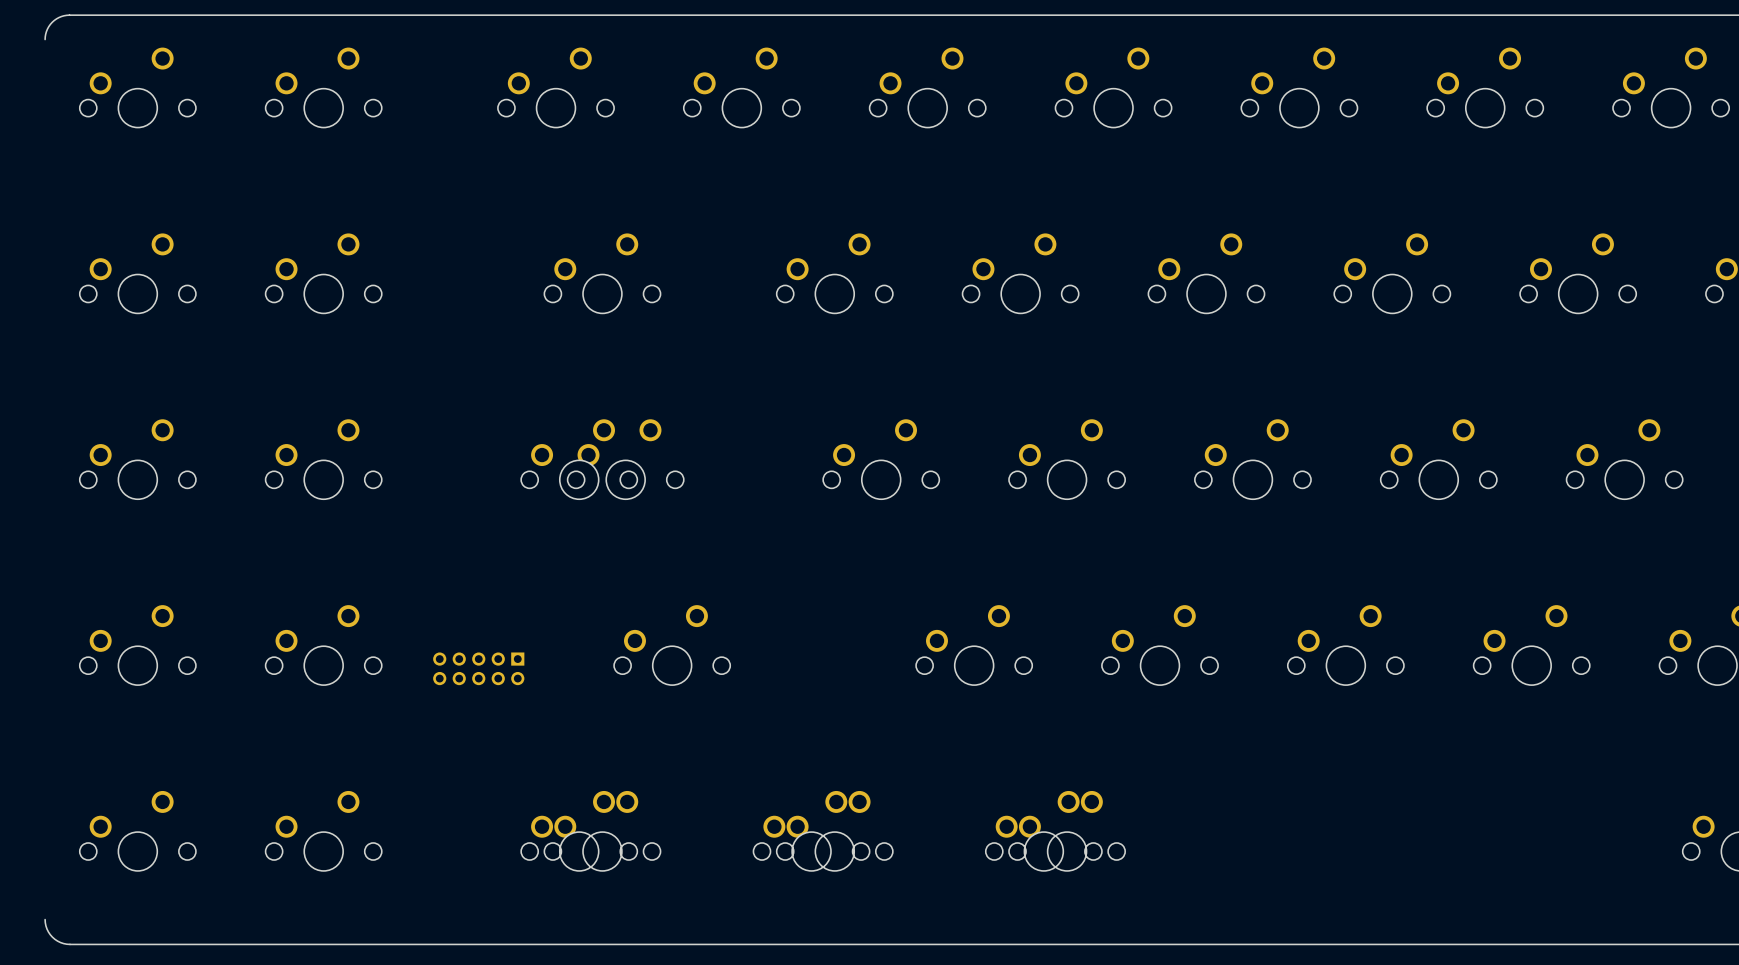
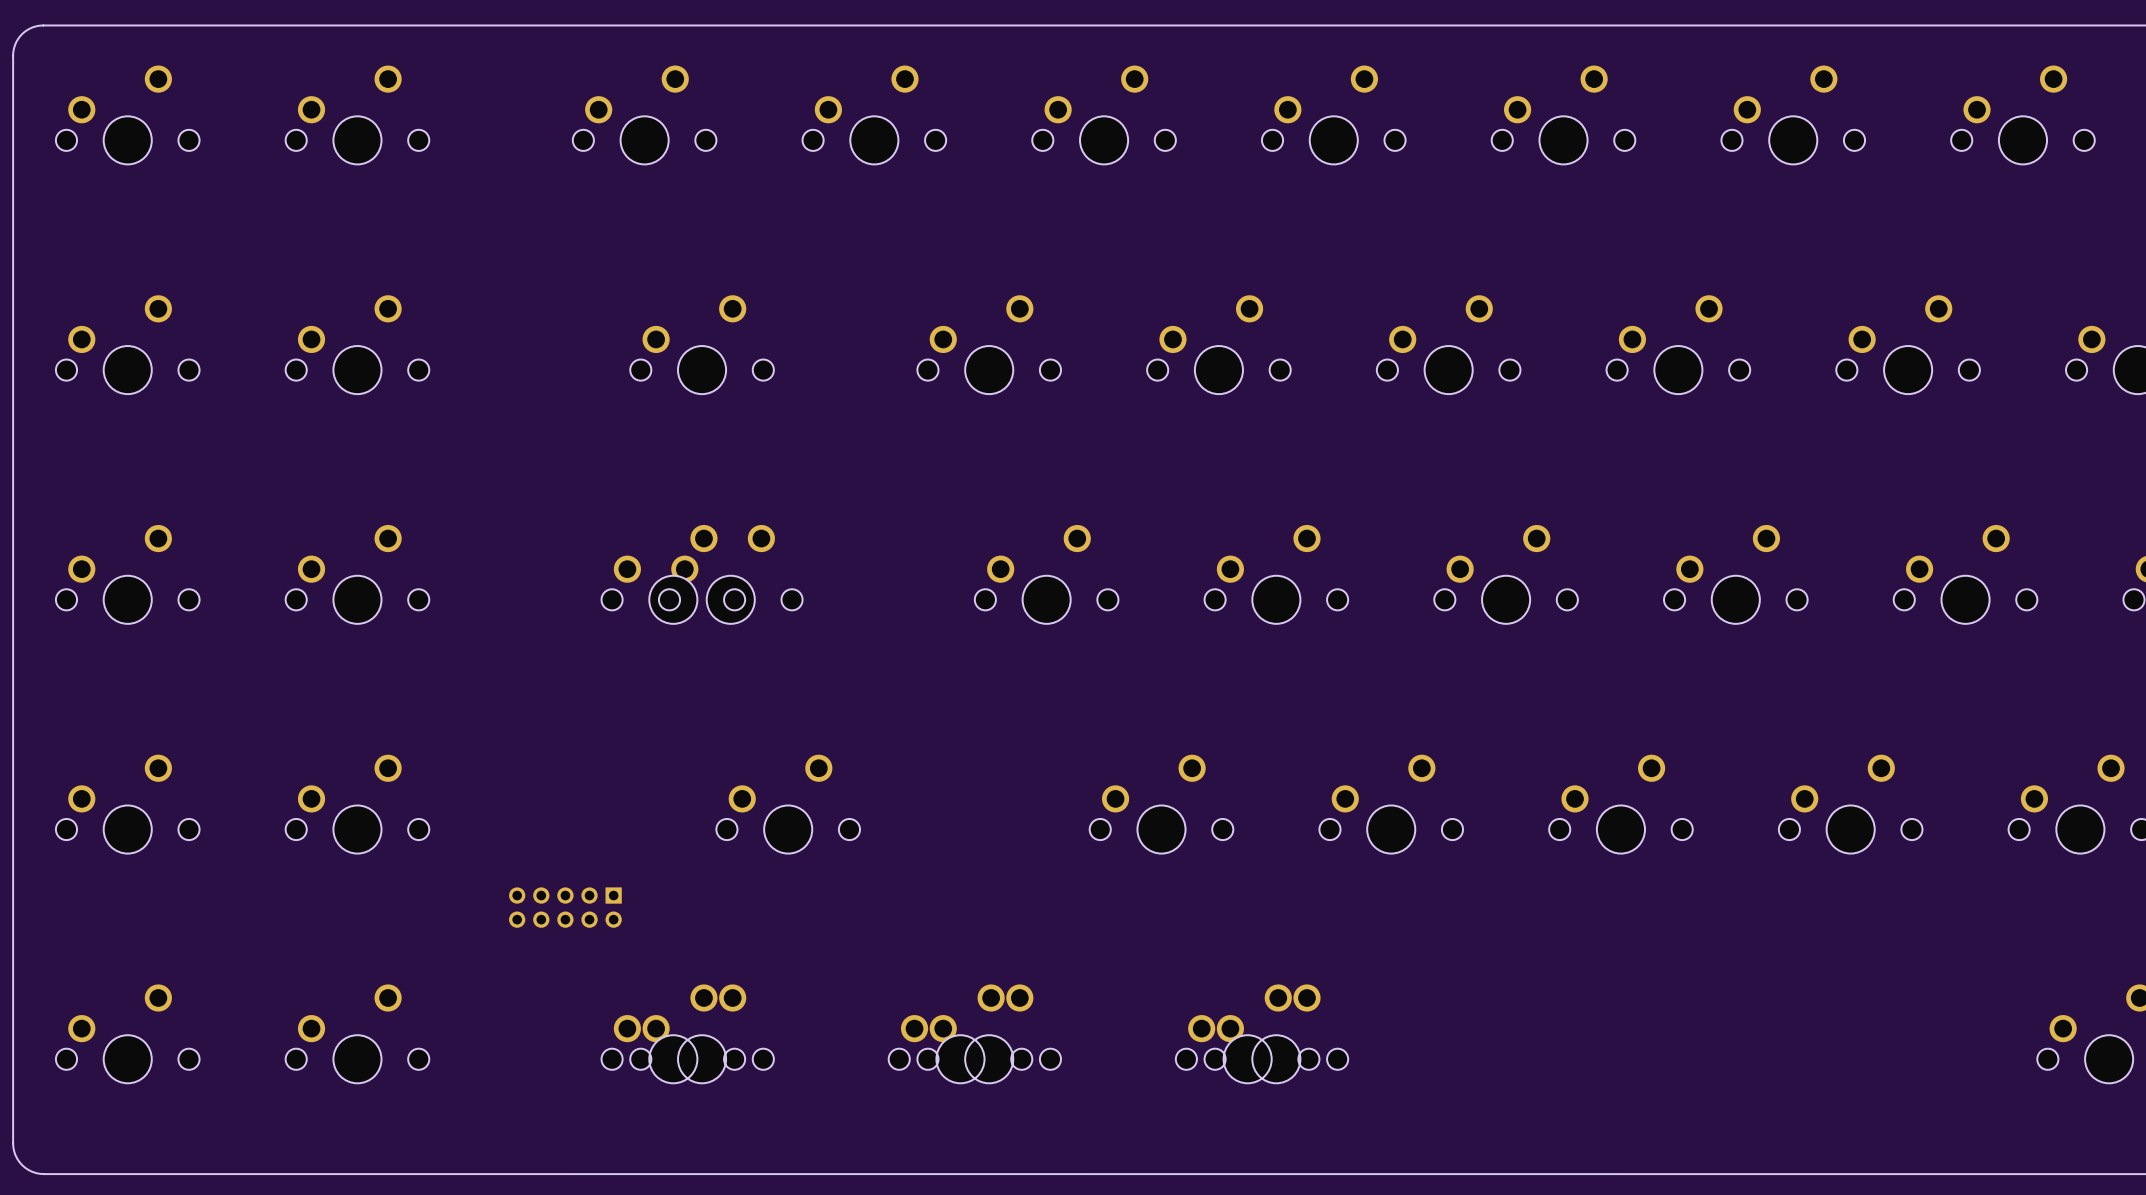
board edge: none -> (13, 55) (13, 1143)
part position: (478, 668) -> (565, 907)

